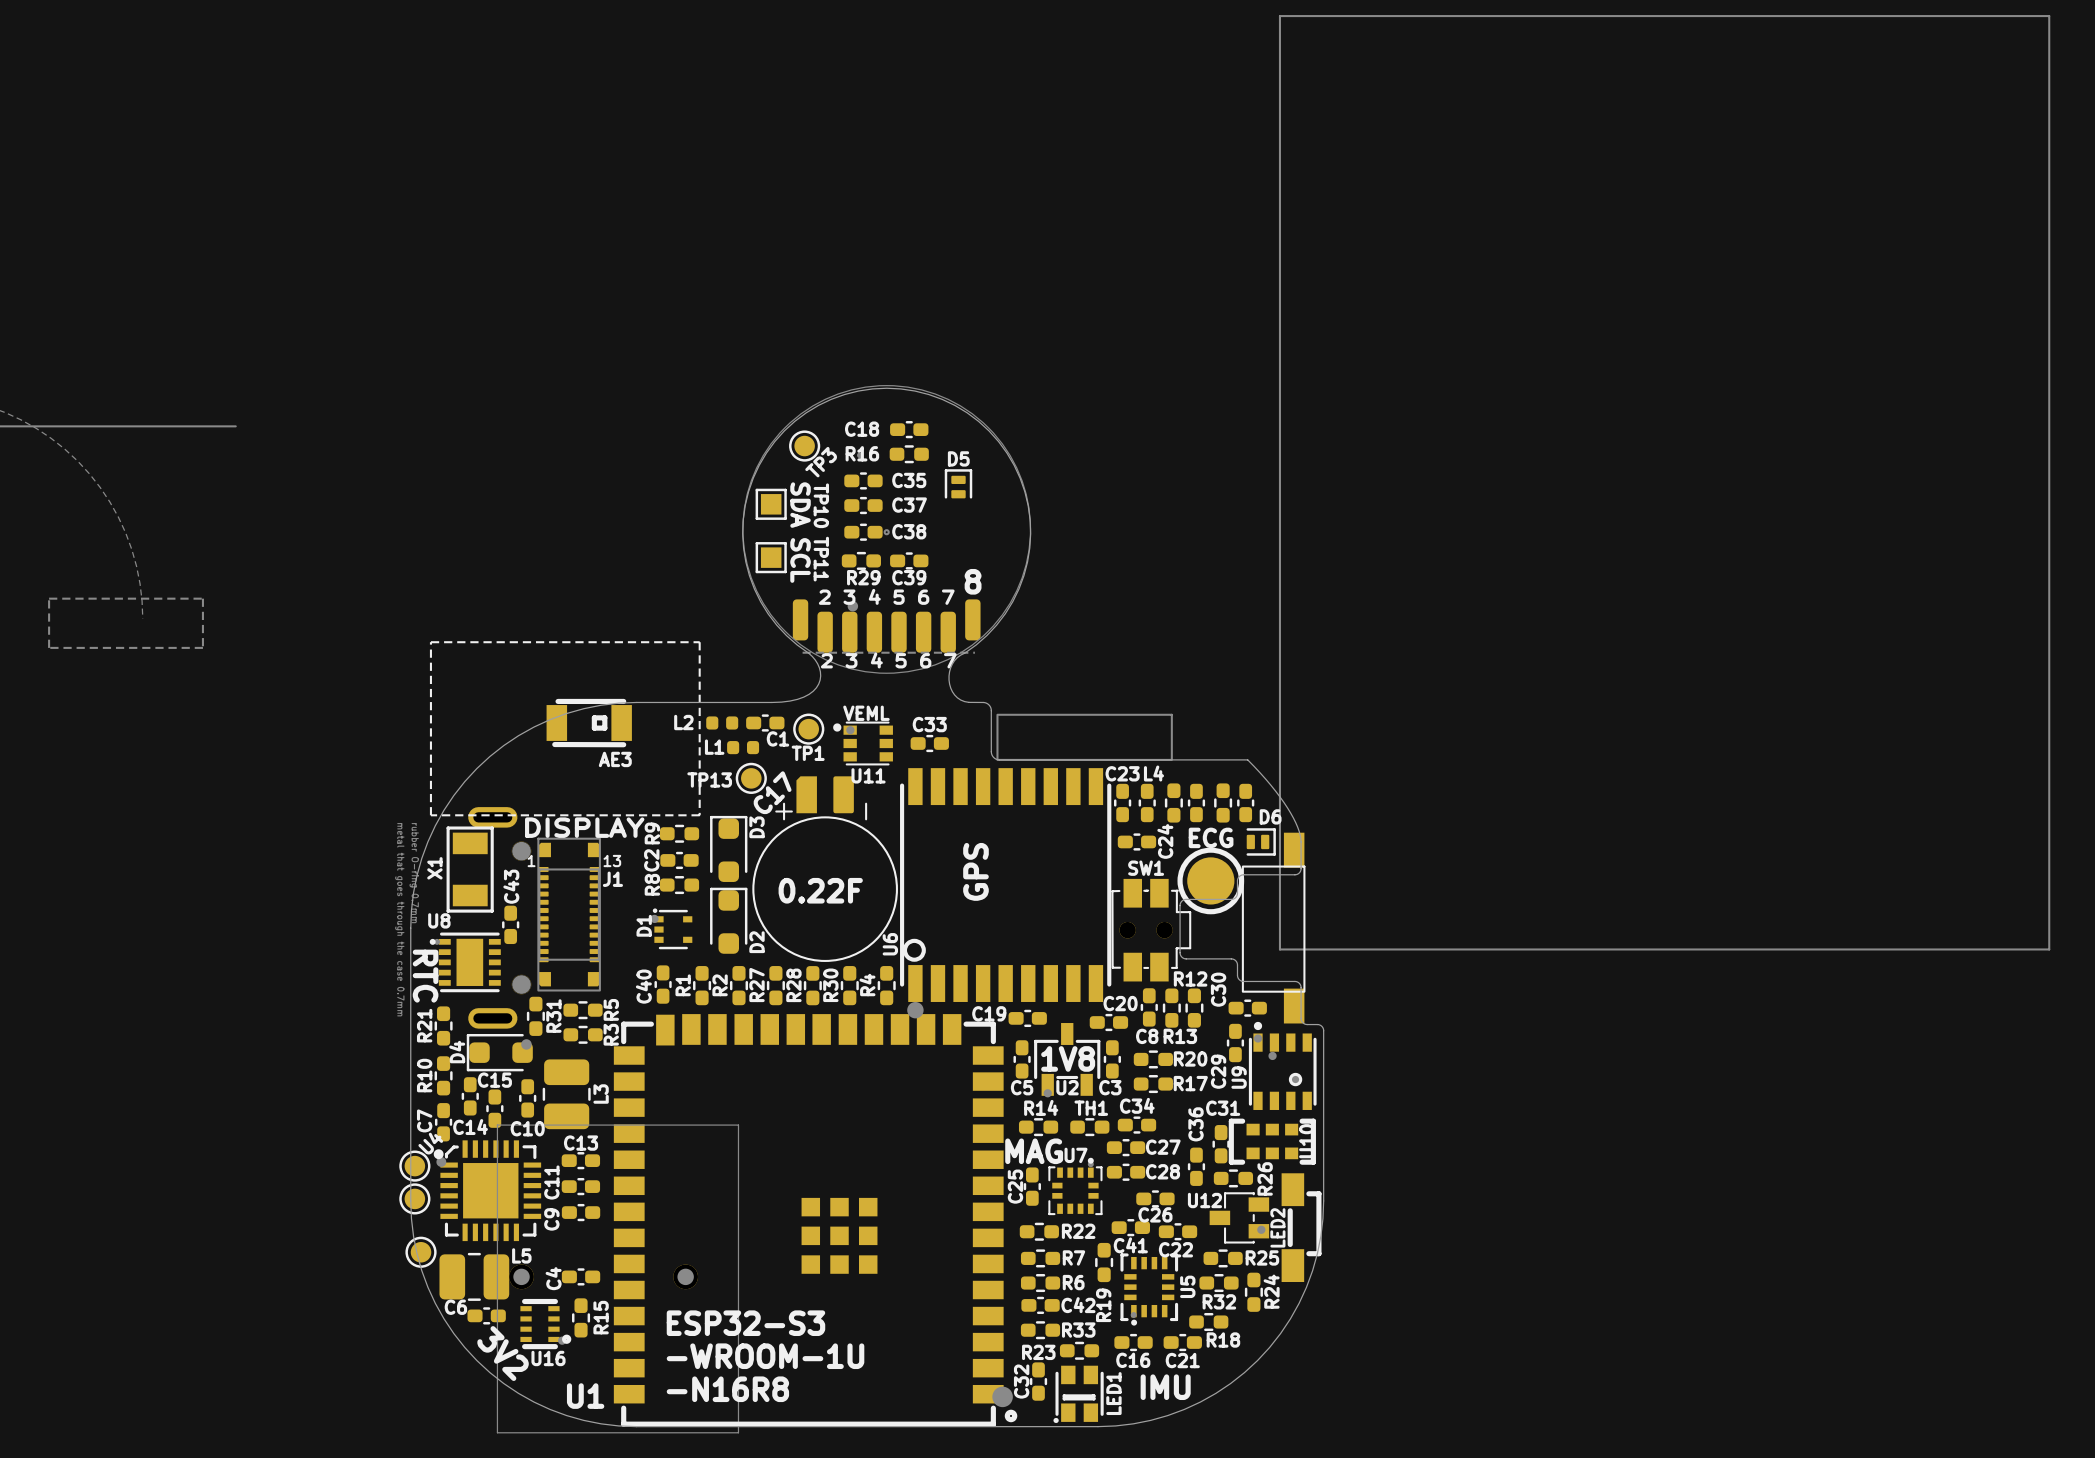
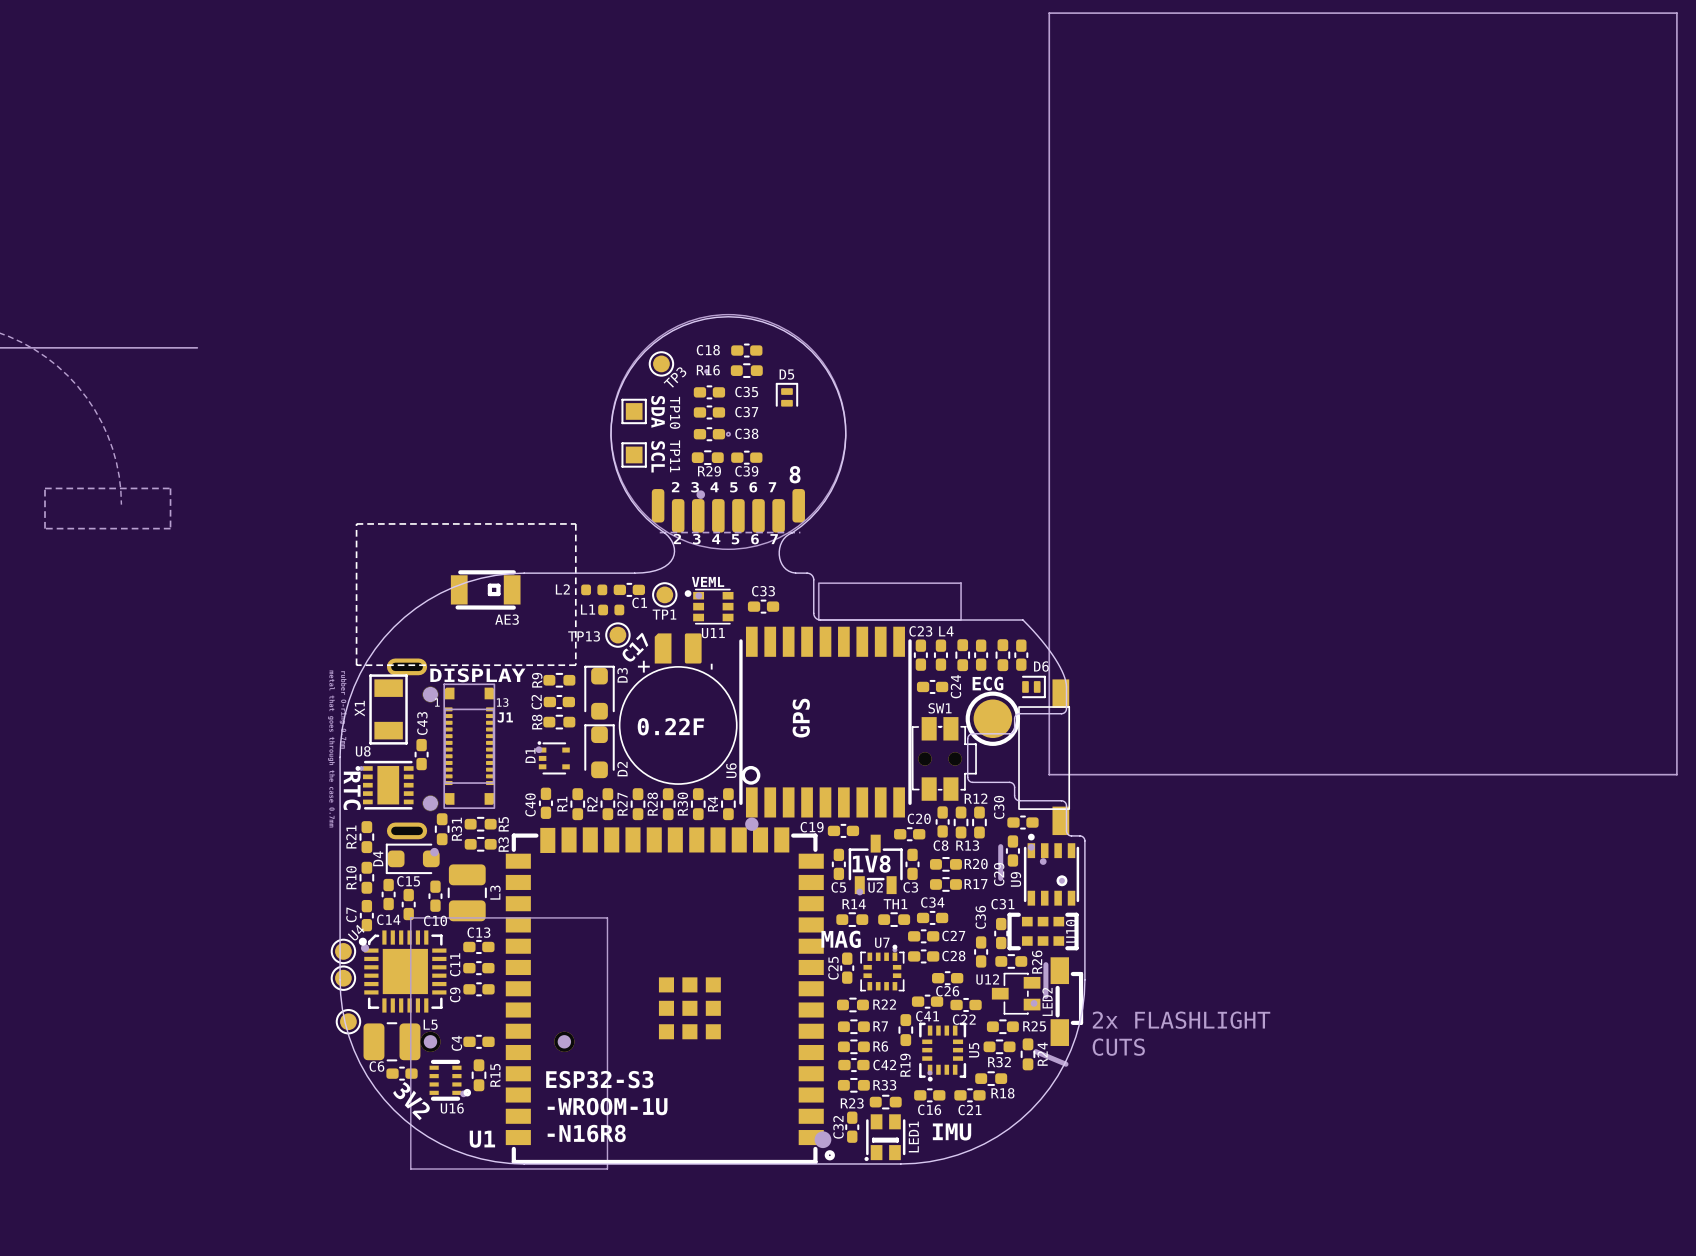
line: none -> (1000, 846) (1000, 878)
line: none -> (1045, 964) (1045, 996)
text: none -> 2x FLASHLIGHT (1181, 1020)
text: none -> CUTS (1118, 1047)
line: none -> (1035, 1051) (1065, 1064)

